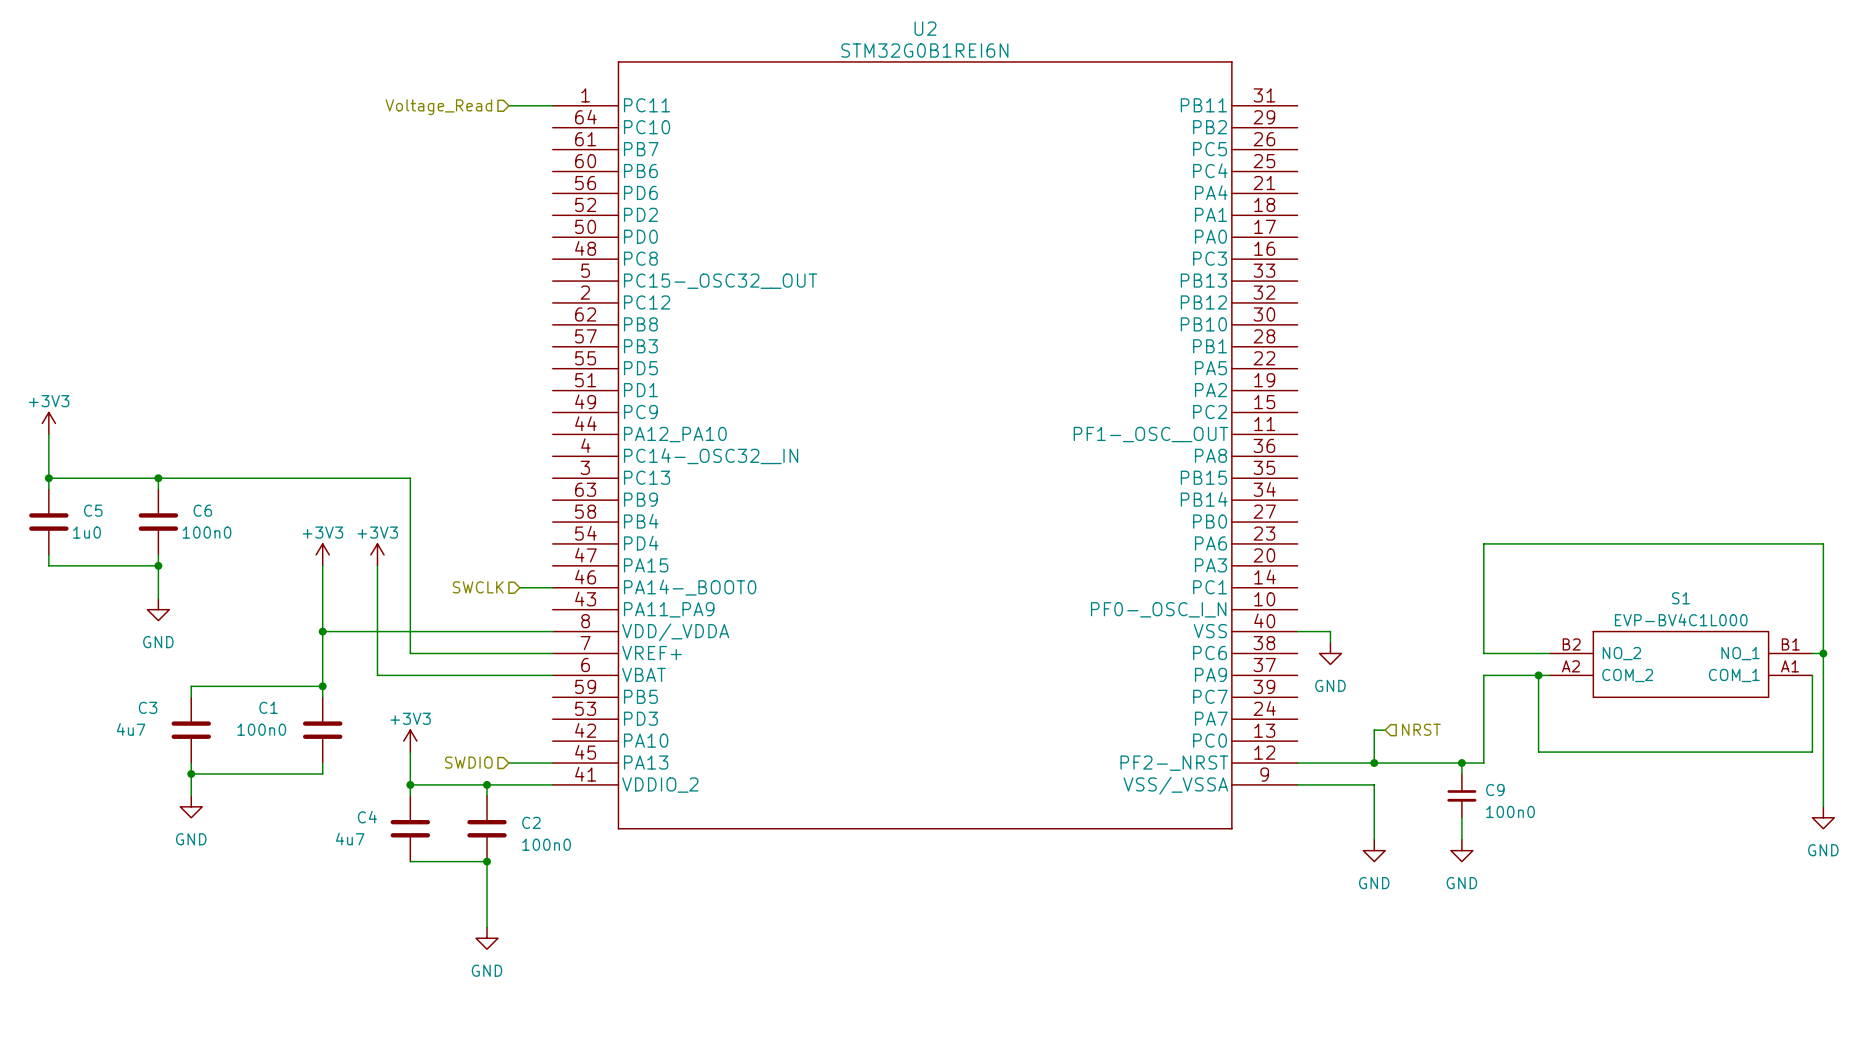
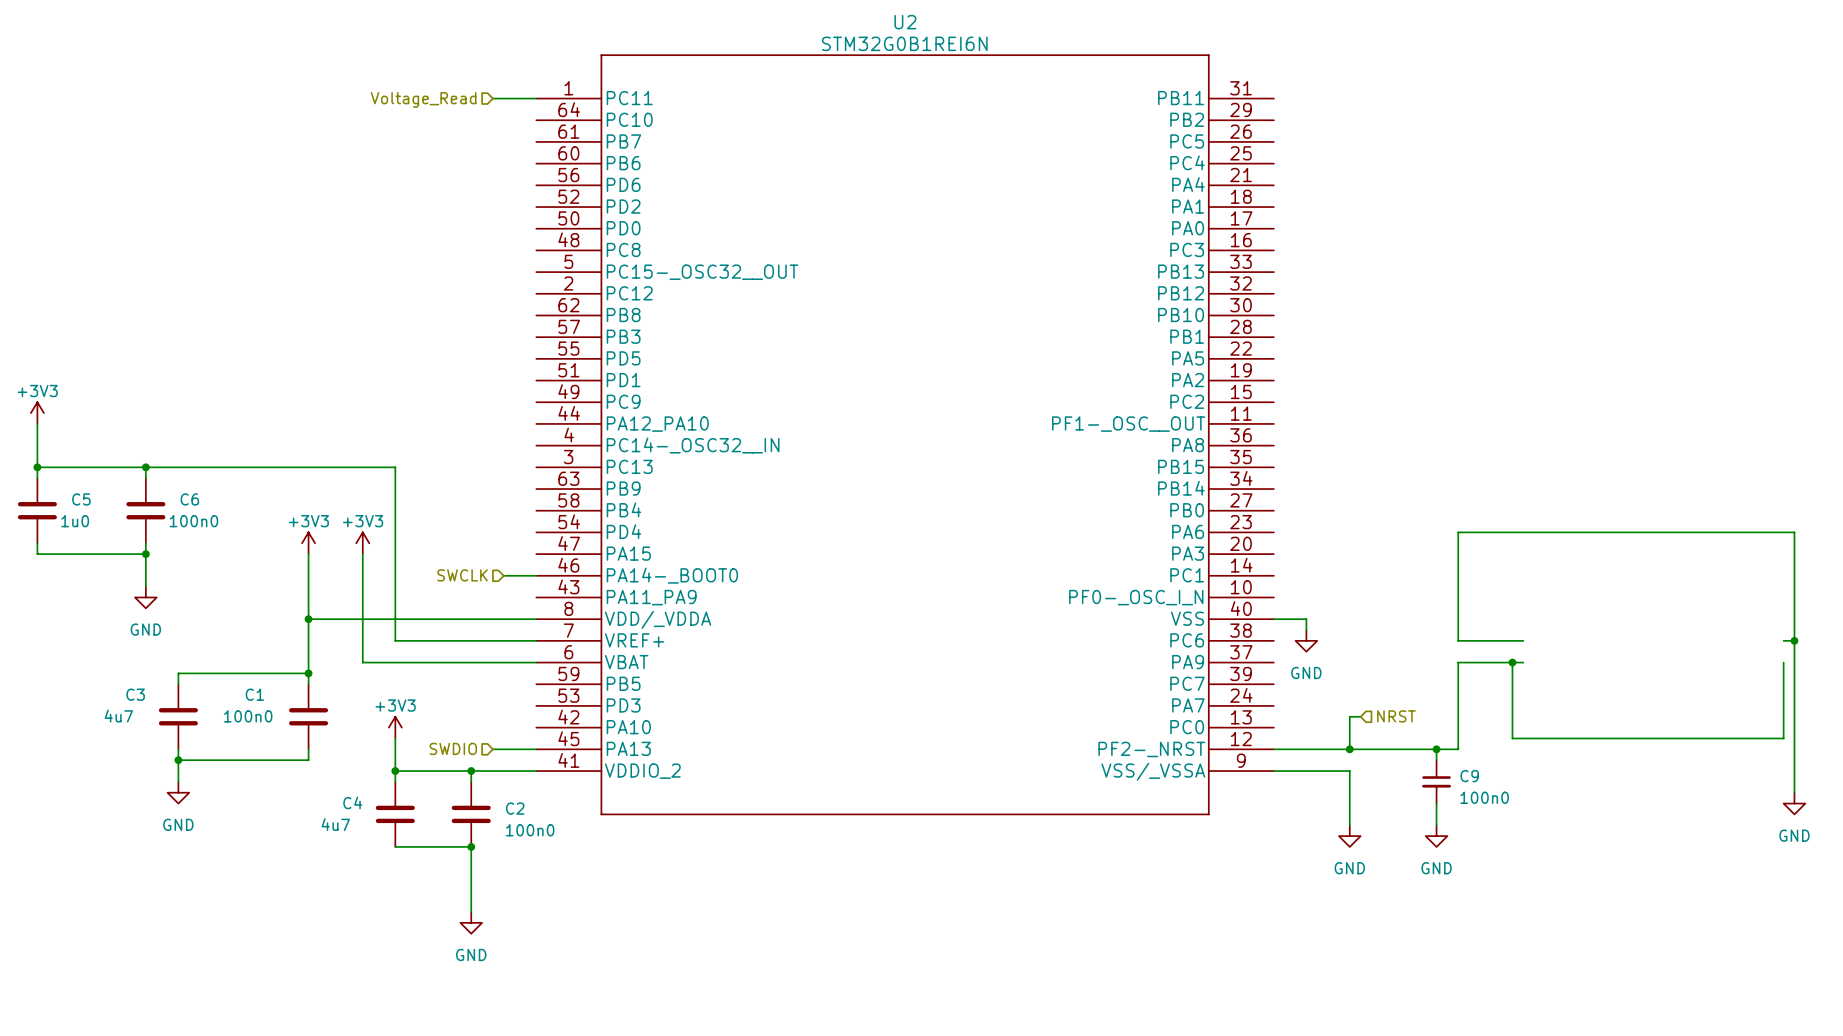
S1: EVP-BV4C1L000 (1680, 664) -> none

